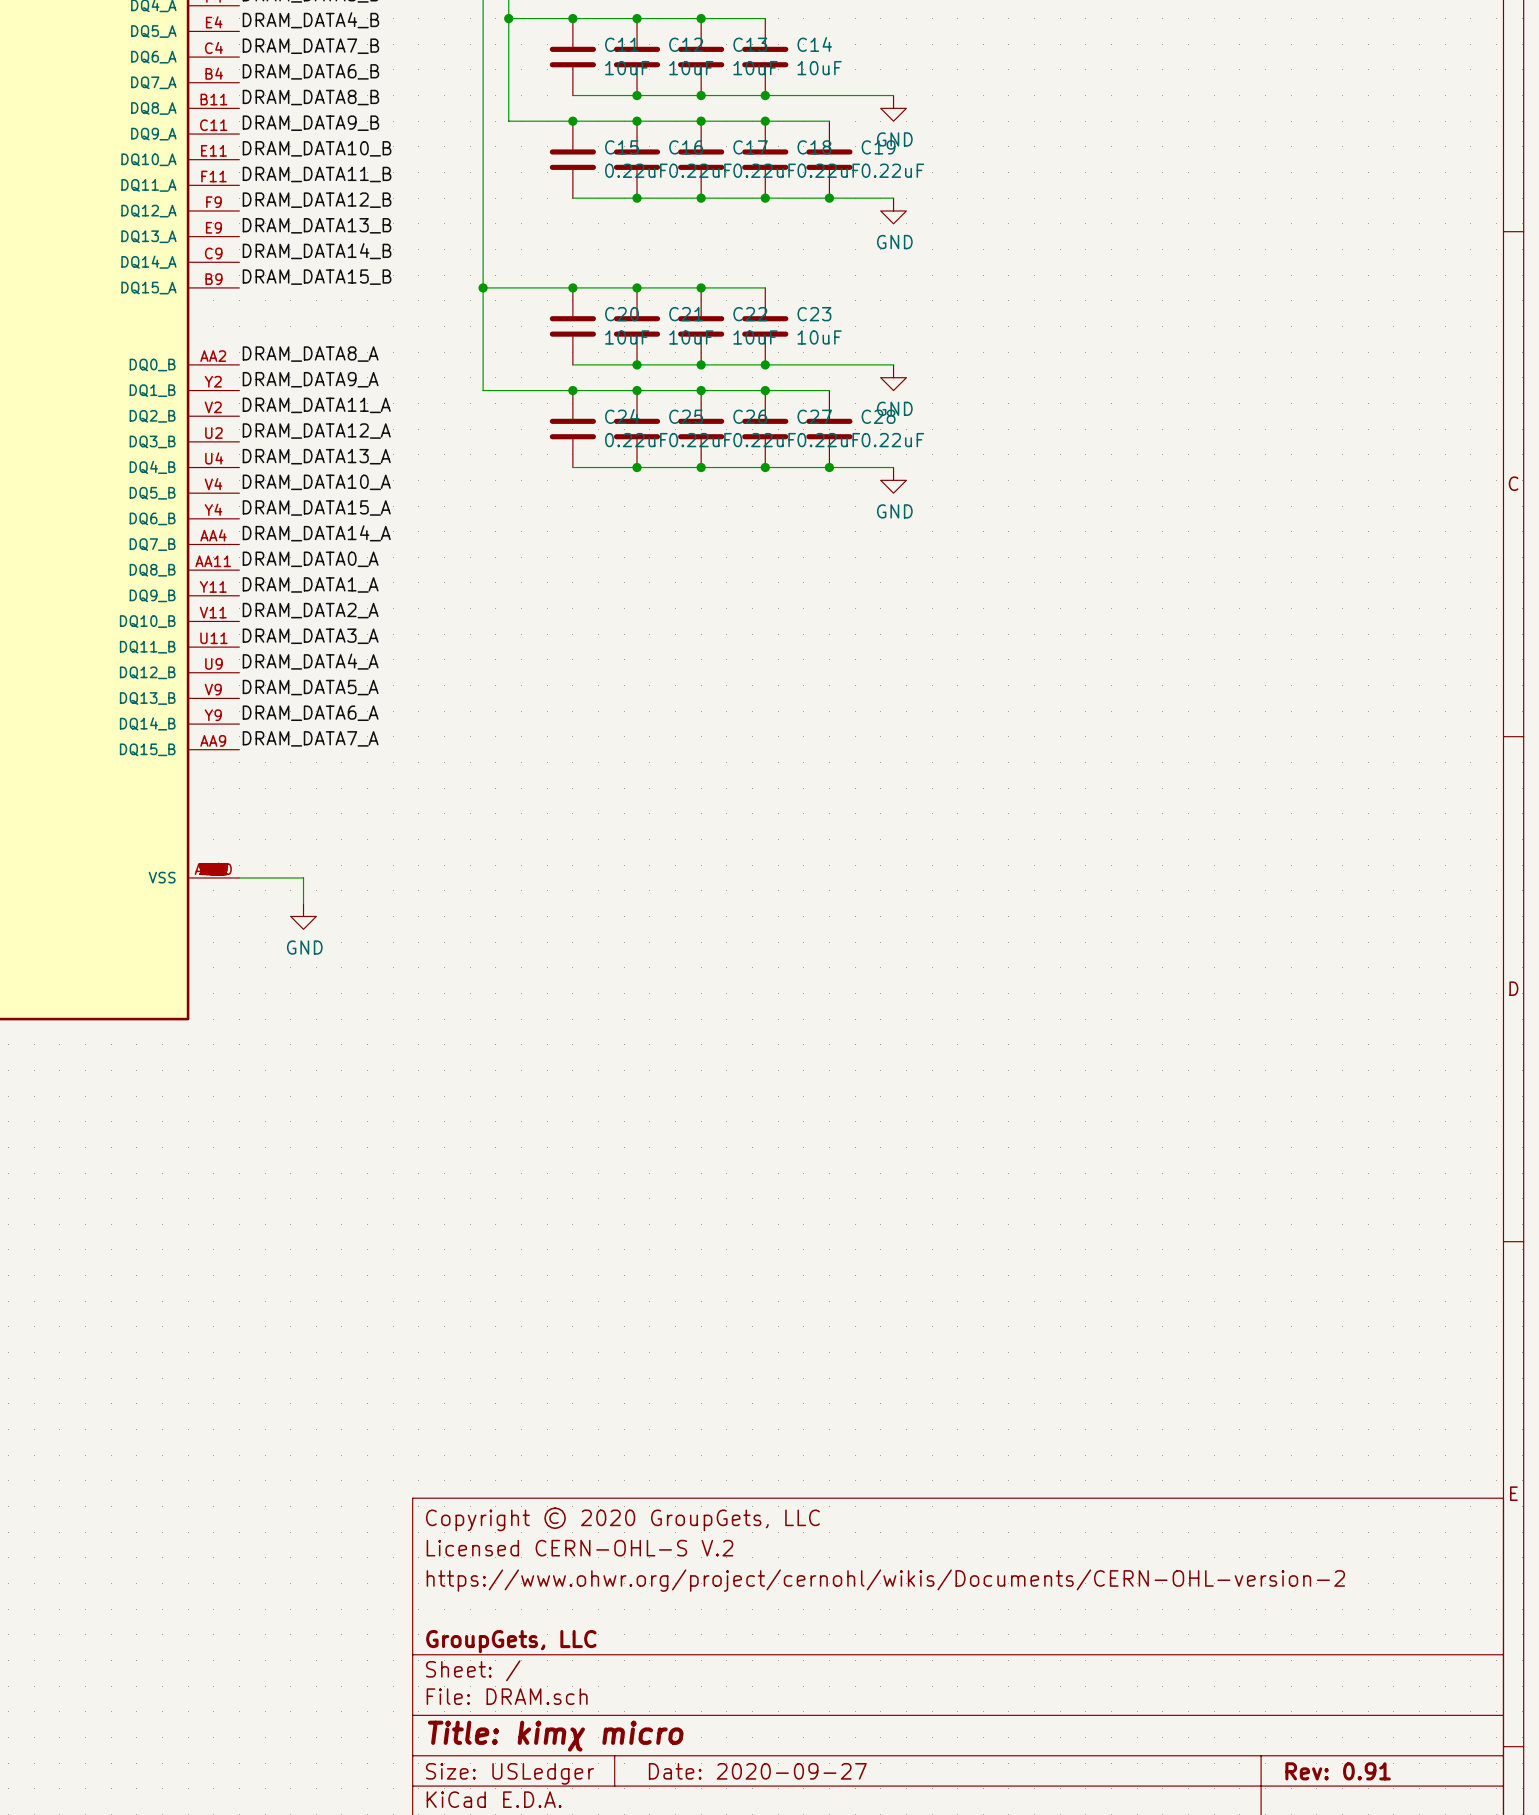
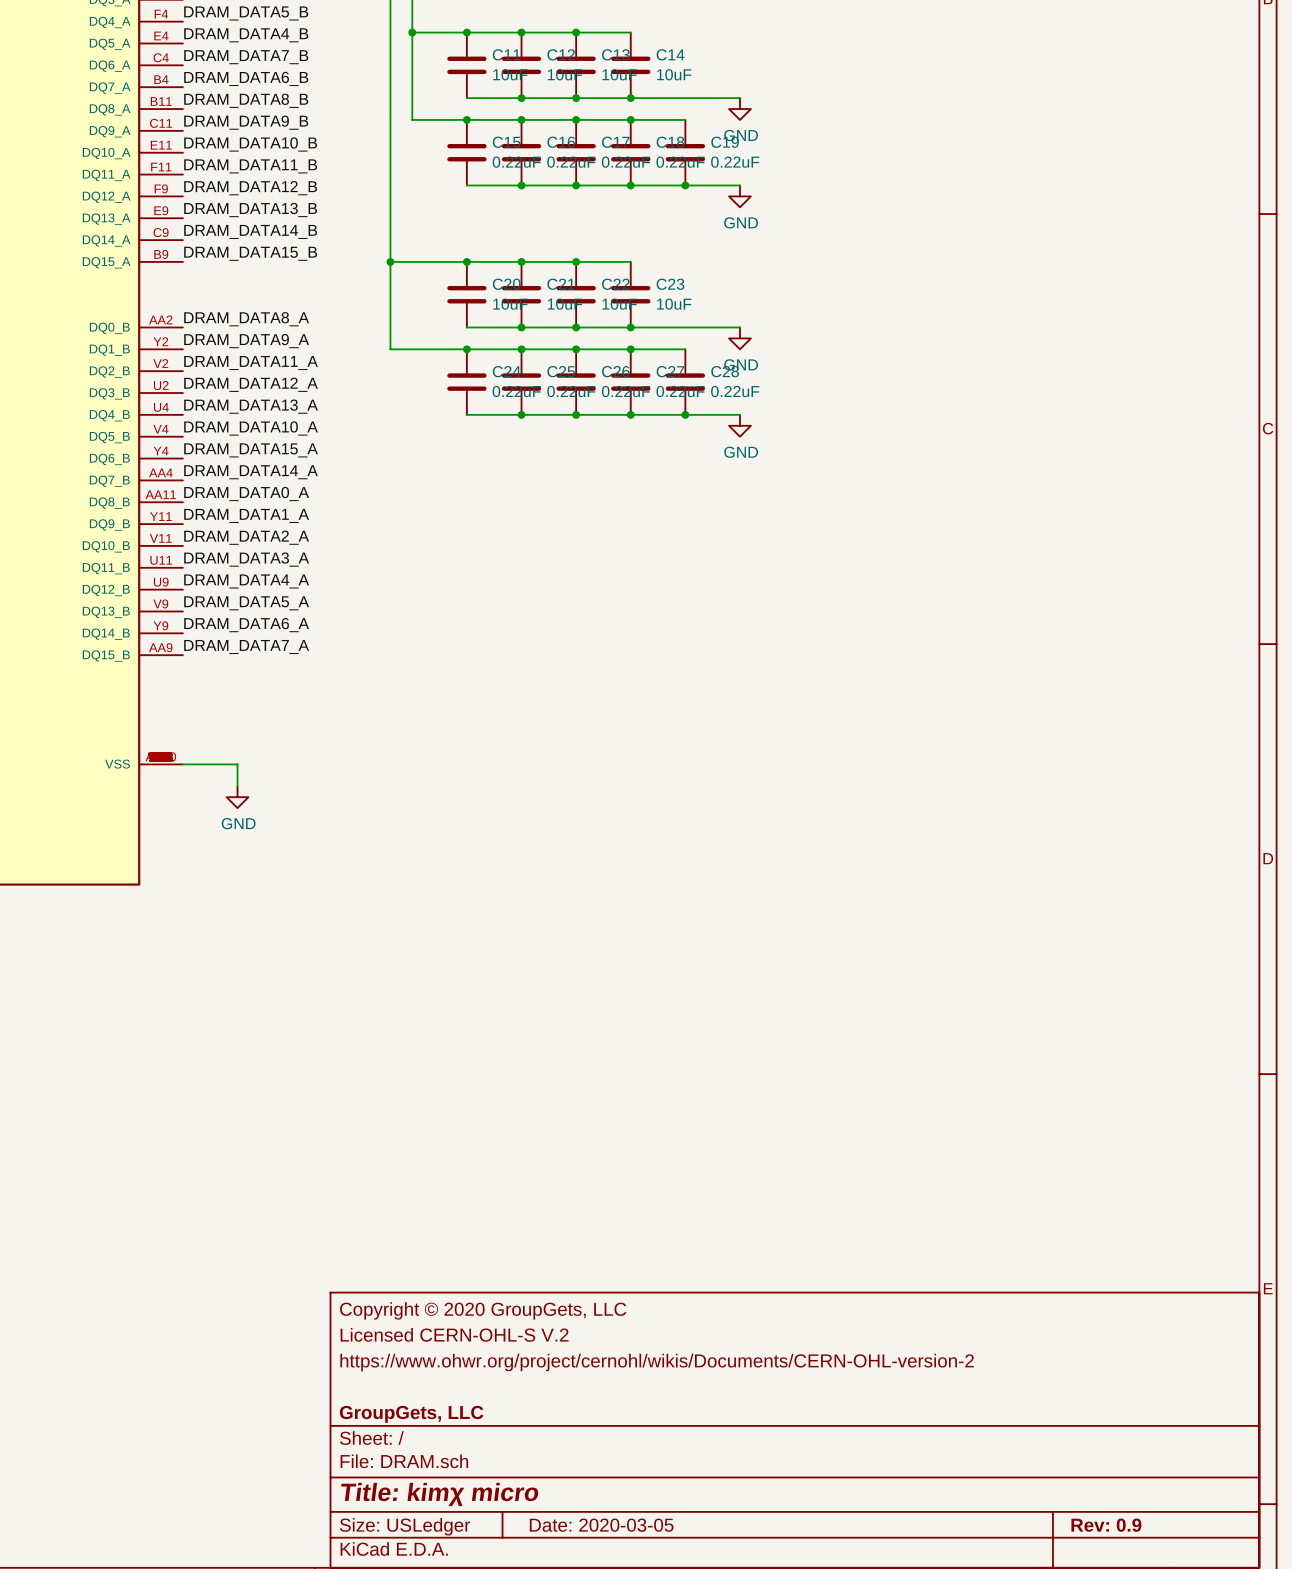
title block: Date: 2020-09-27 (757, 1771) -> Date: 2020-03-05 (601, 1525)
title block: Rev: 0.91 (1338, 1771) -> Rev: 0.9 (1106, 1525)

